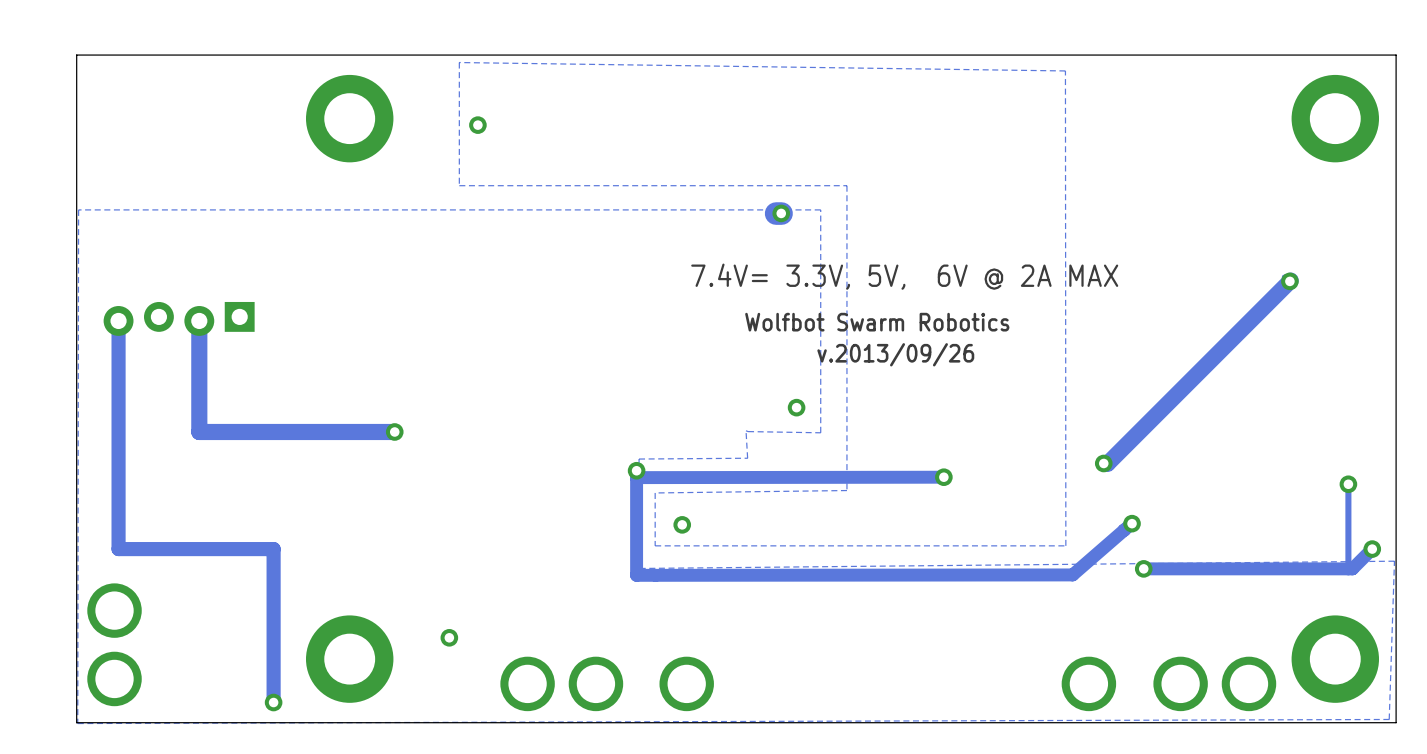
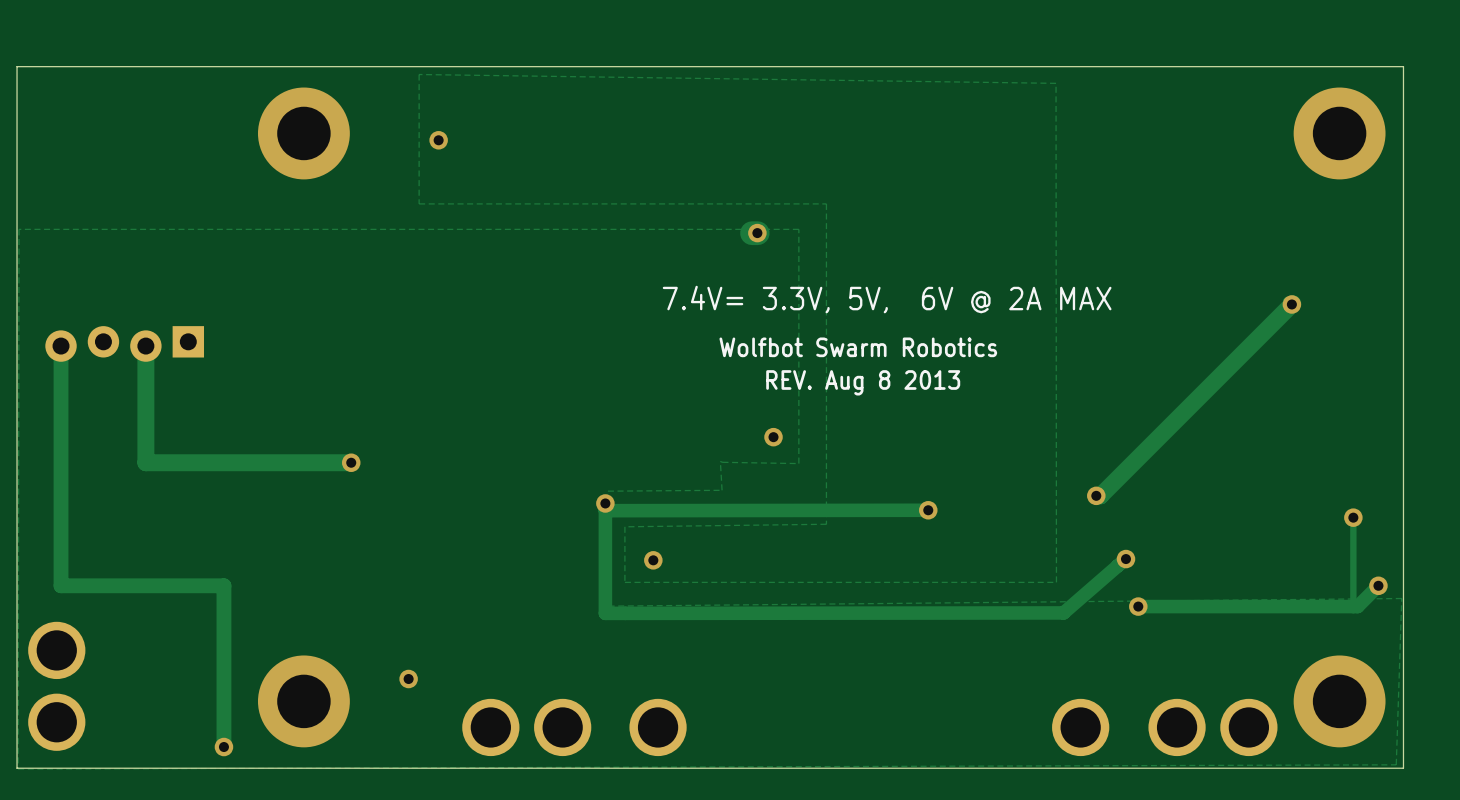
text: v.2013/09/26 (895, 354) -> REV. Aug 8 2013 (863, 382)

